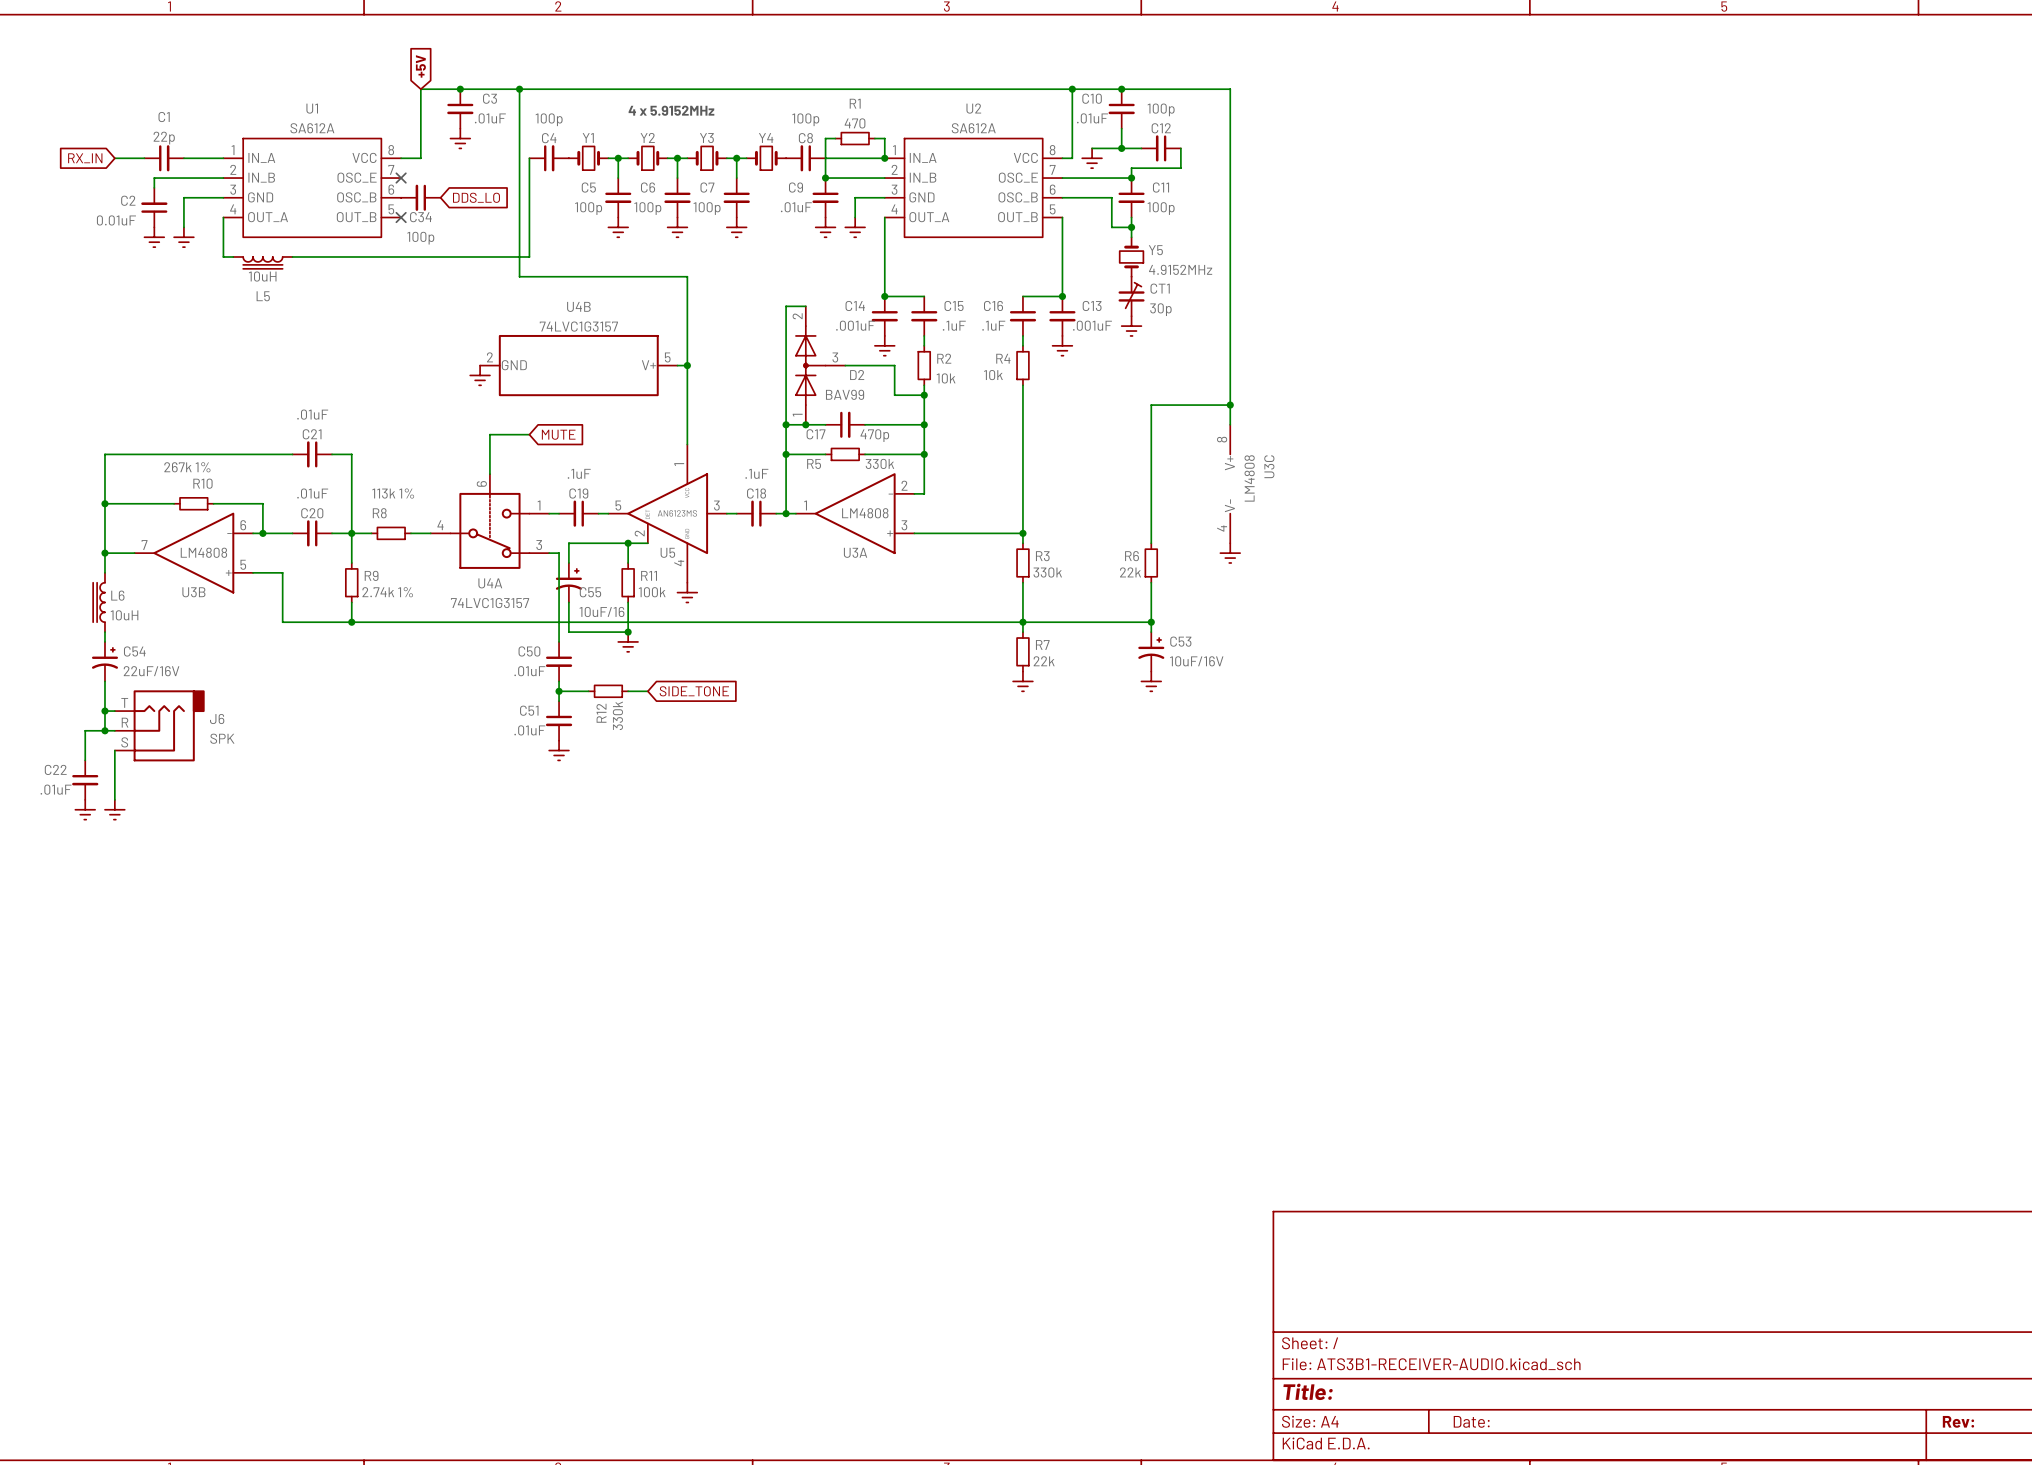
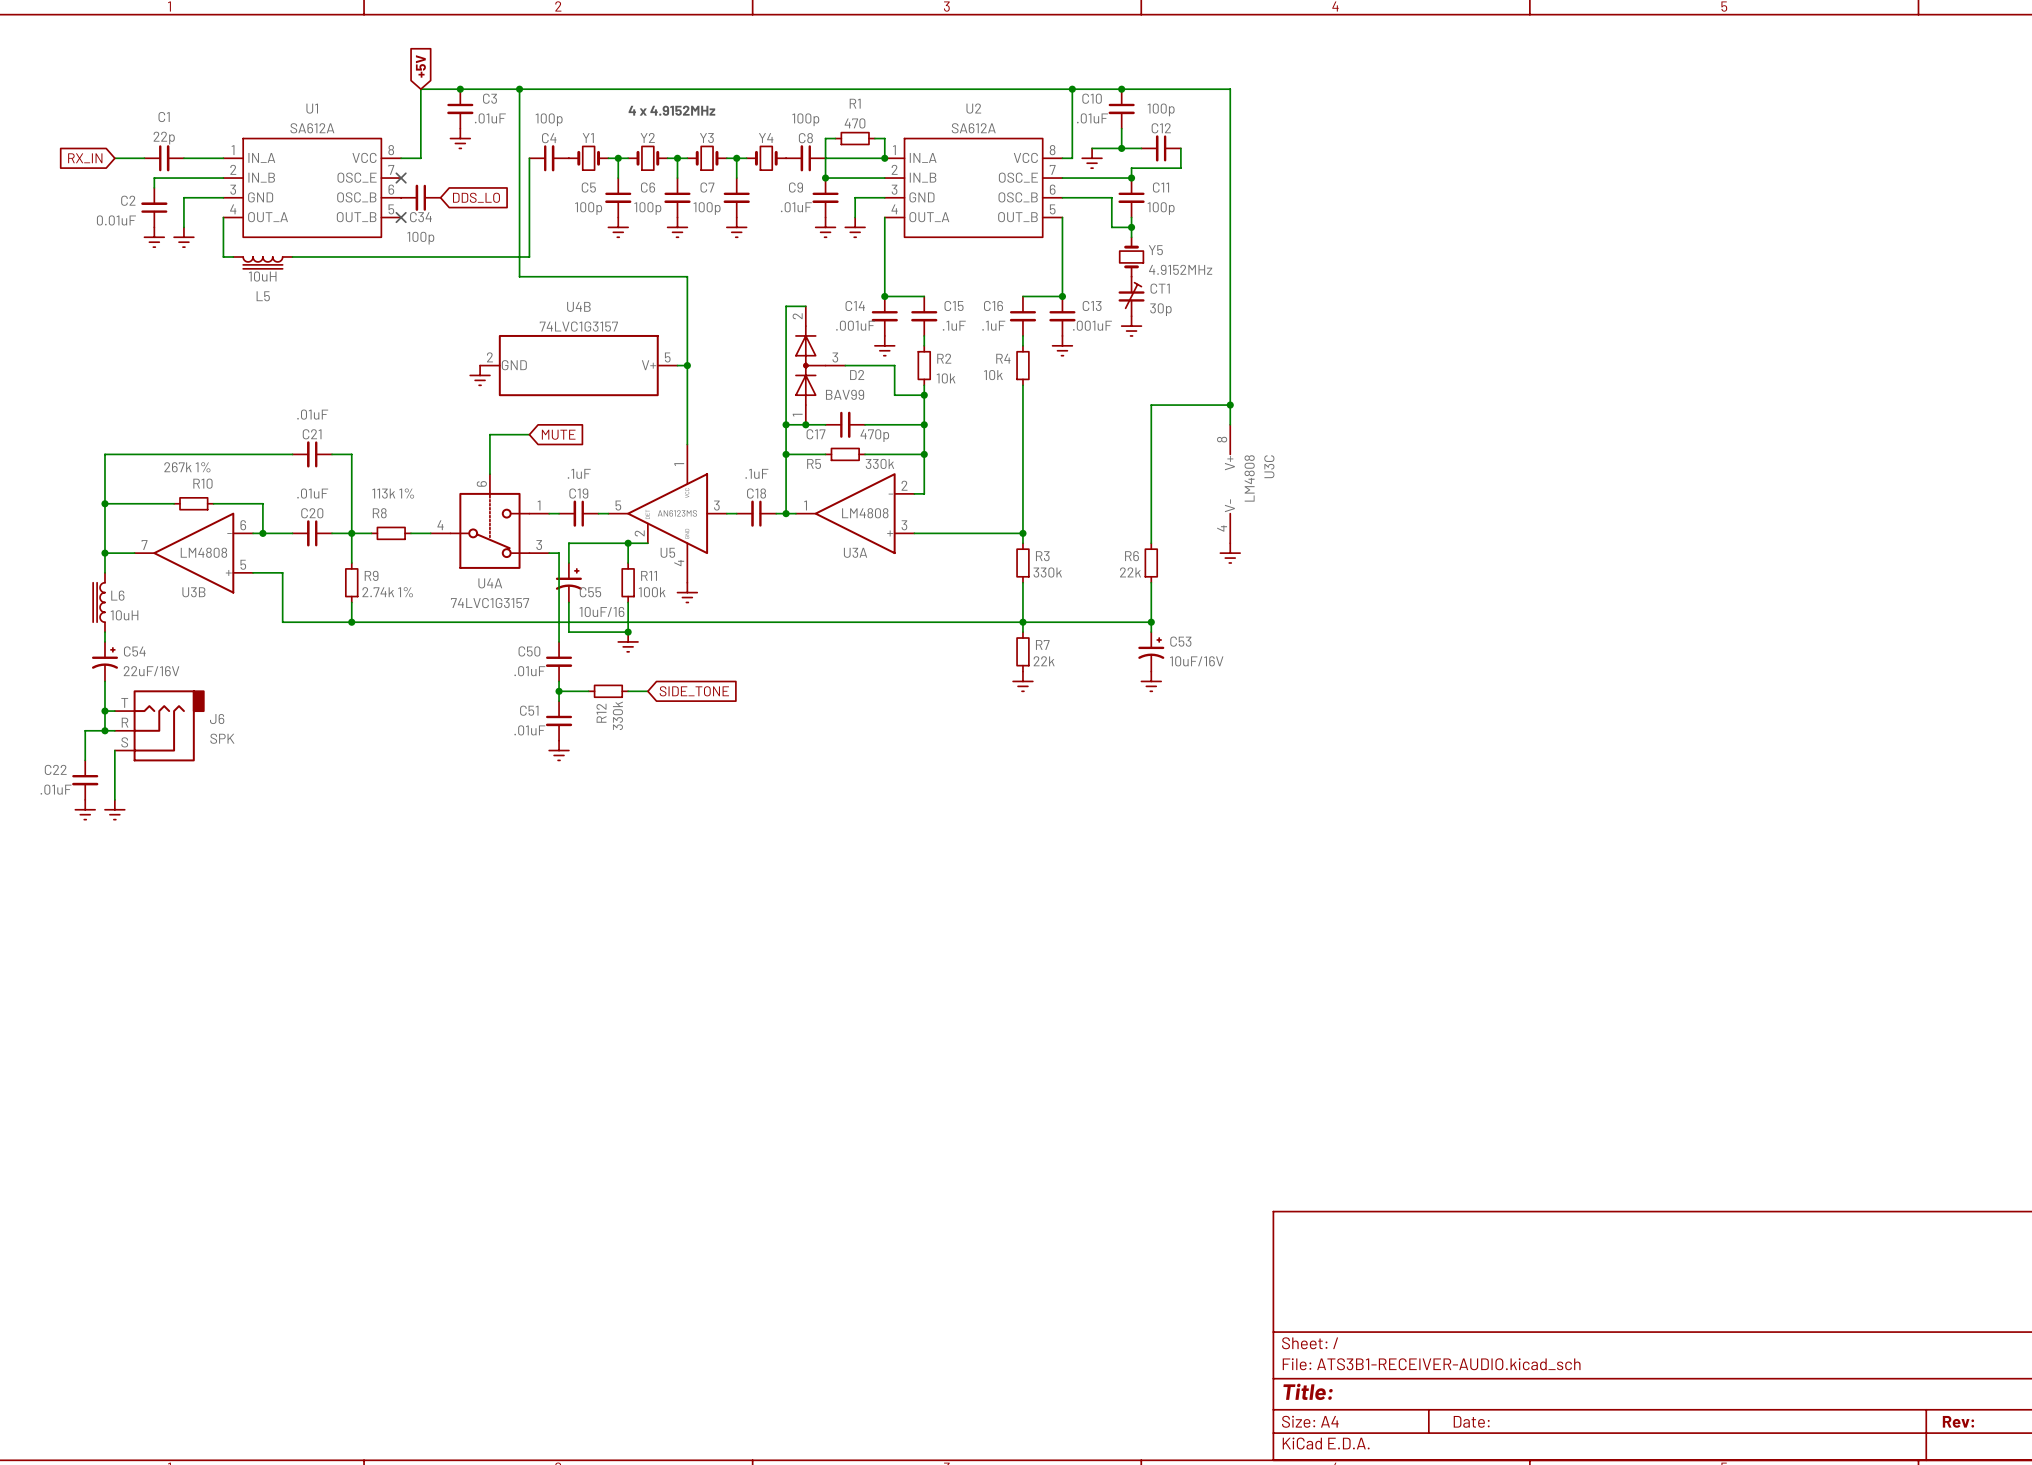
text: 4 x 5.9152MHz (671, 110) -> 4 x 4.9152MHz (671, 110)

